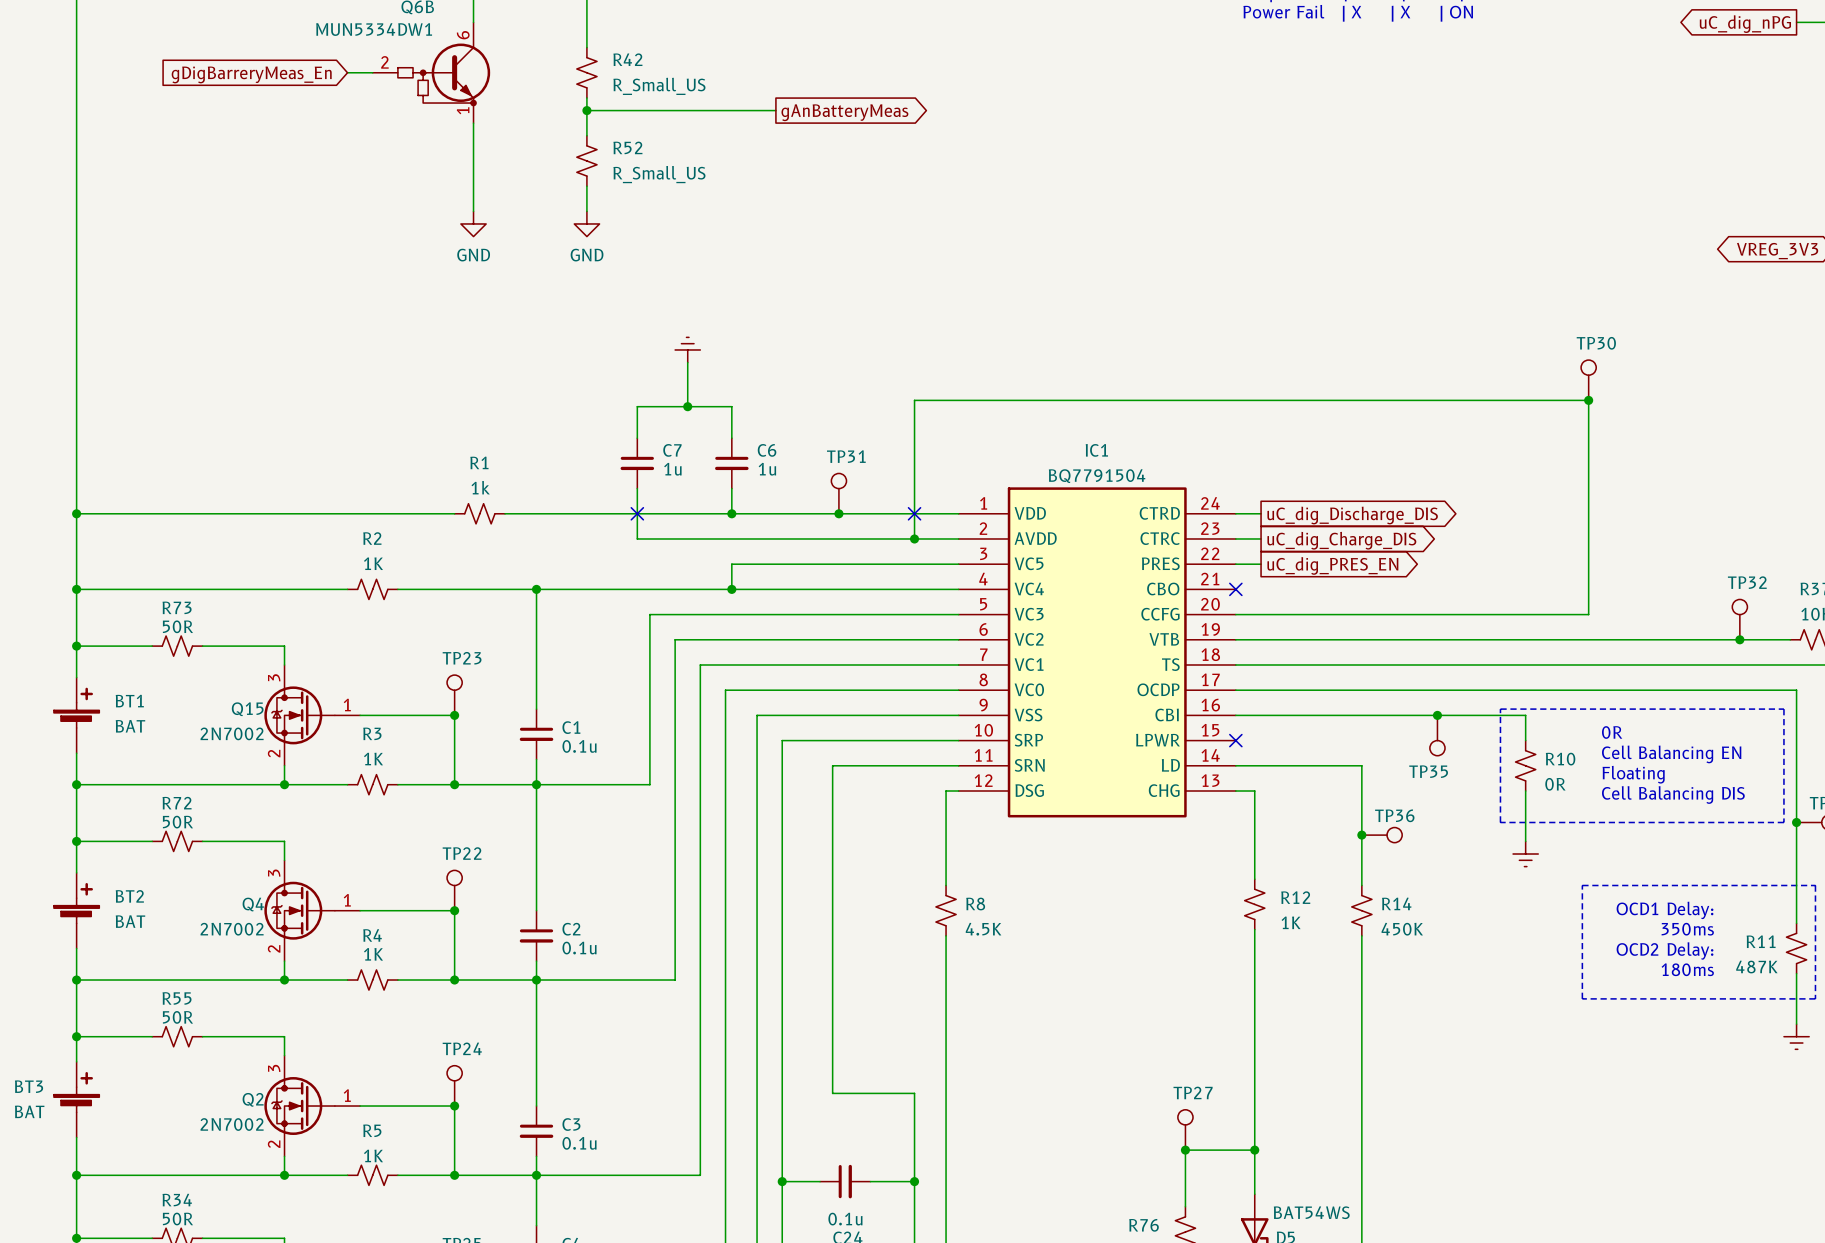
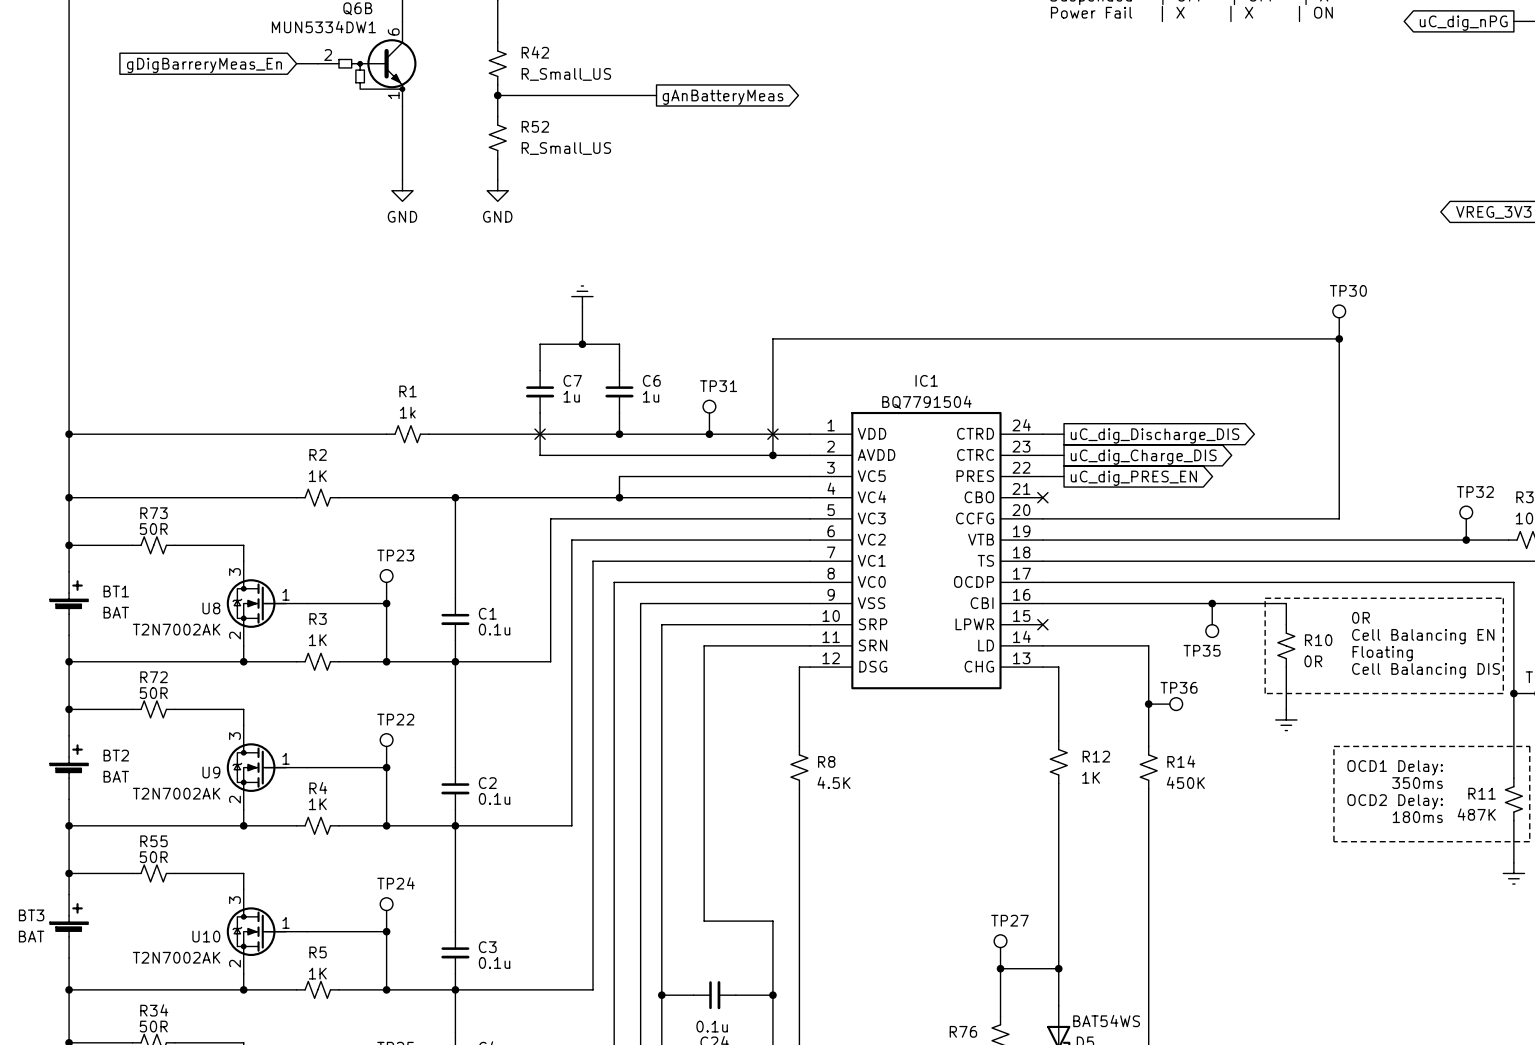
Q15: 2N7002 (312, 715) -> none
U8: none -> T2N7002AK (267, 603)
Q4: 2N7002 (312, 910) -> none
U9: none -> T2N7002AK (267, 767)
Q2: 2N7002 (312, 1106) -> none
U10: none -> T2N7002AK (267, 931)

